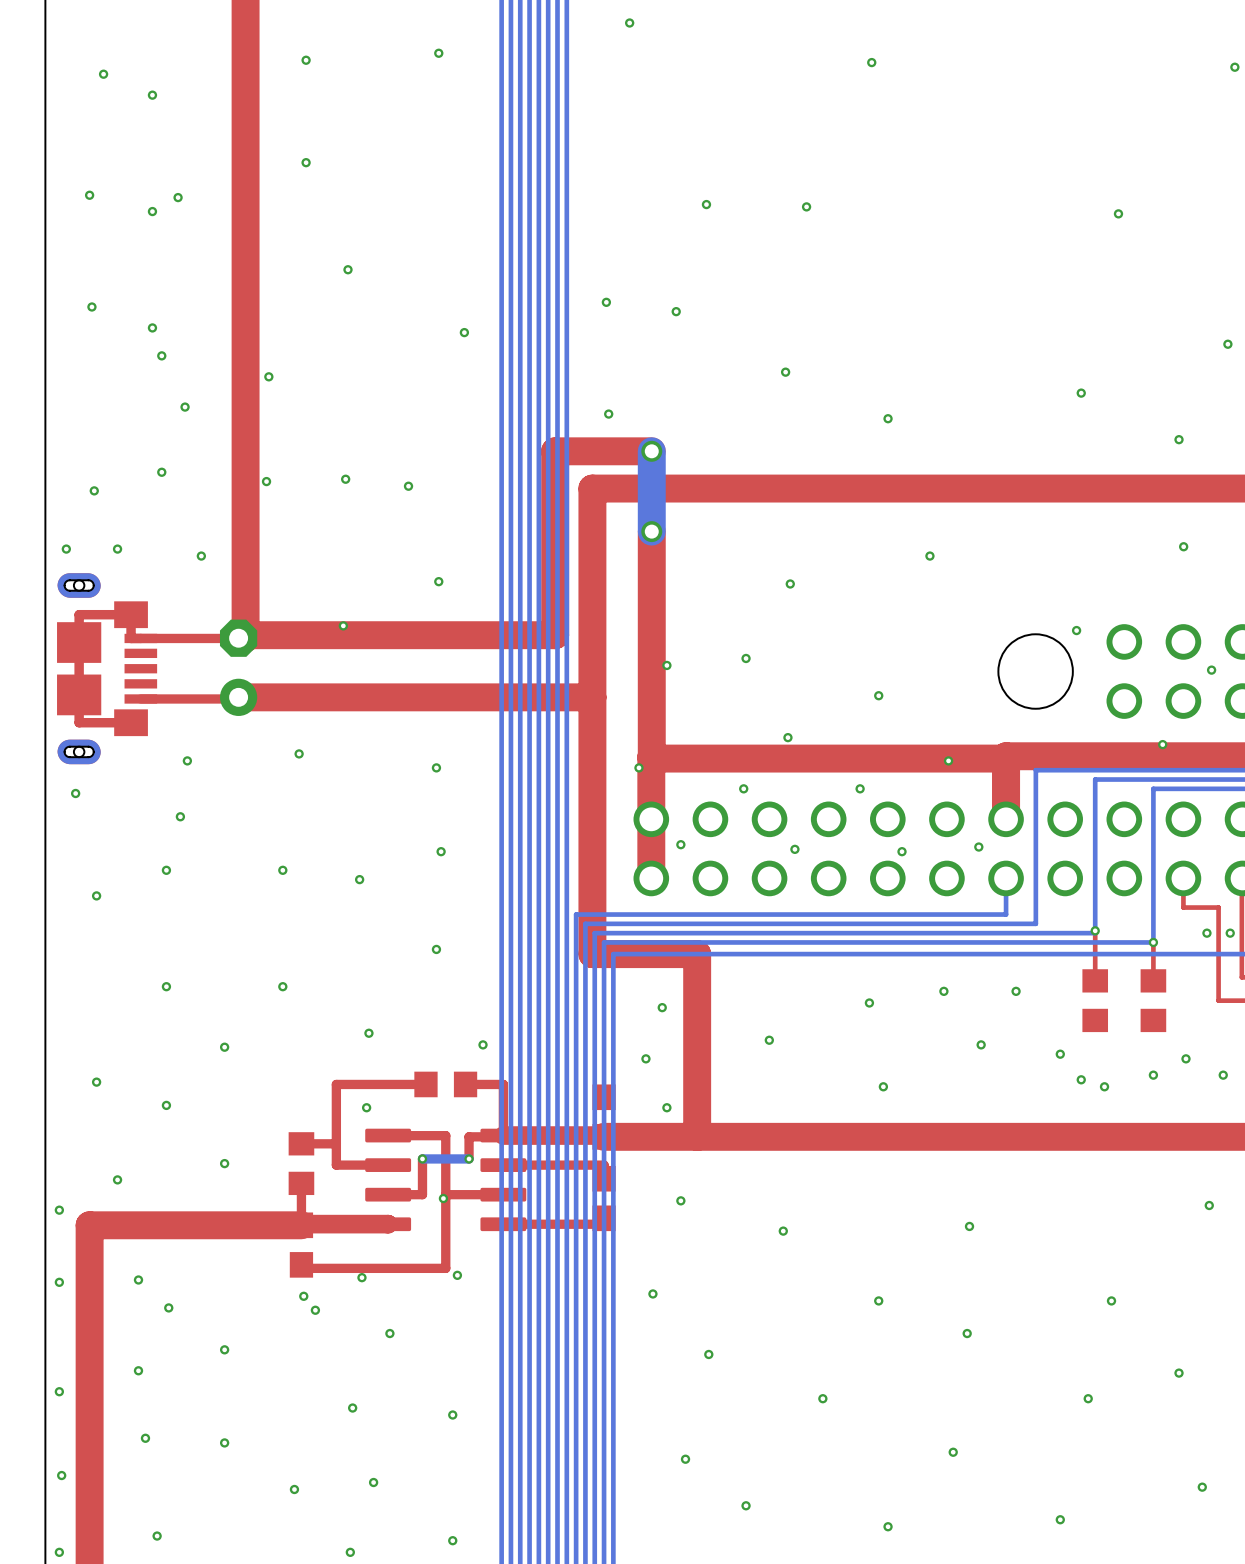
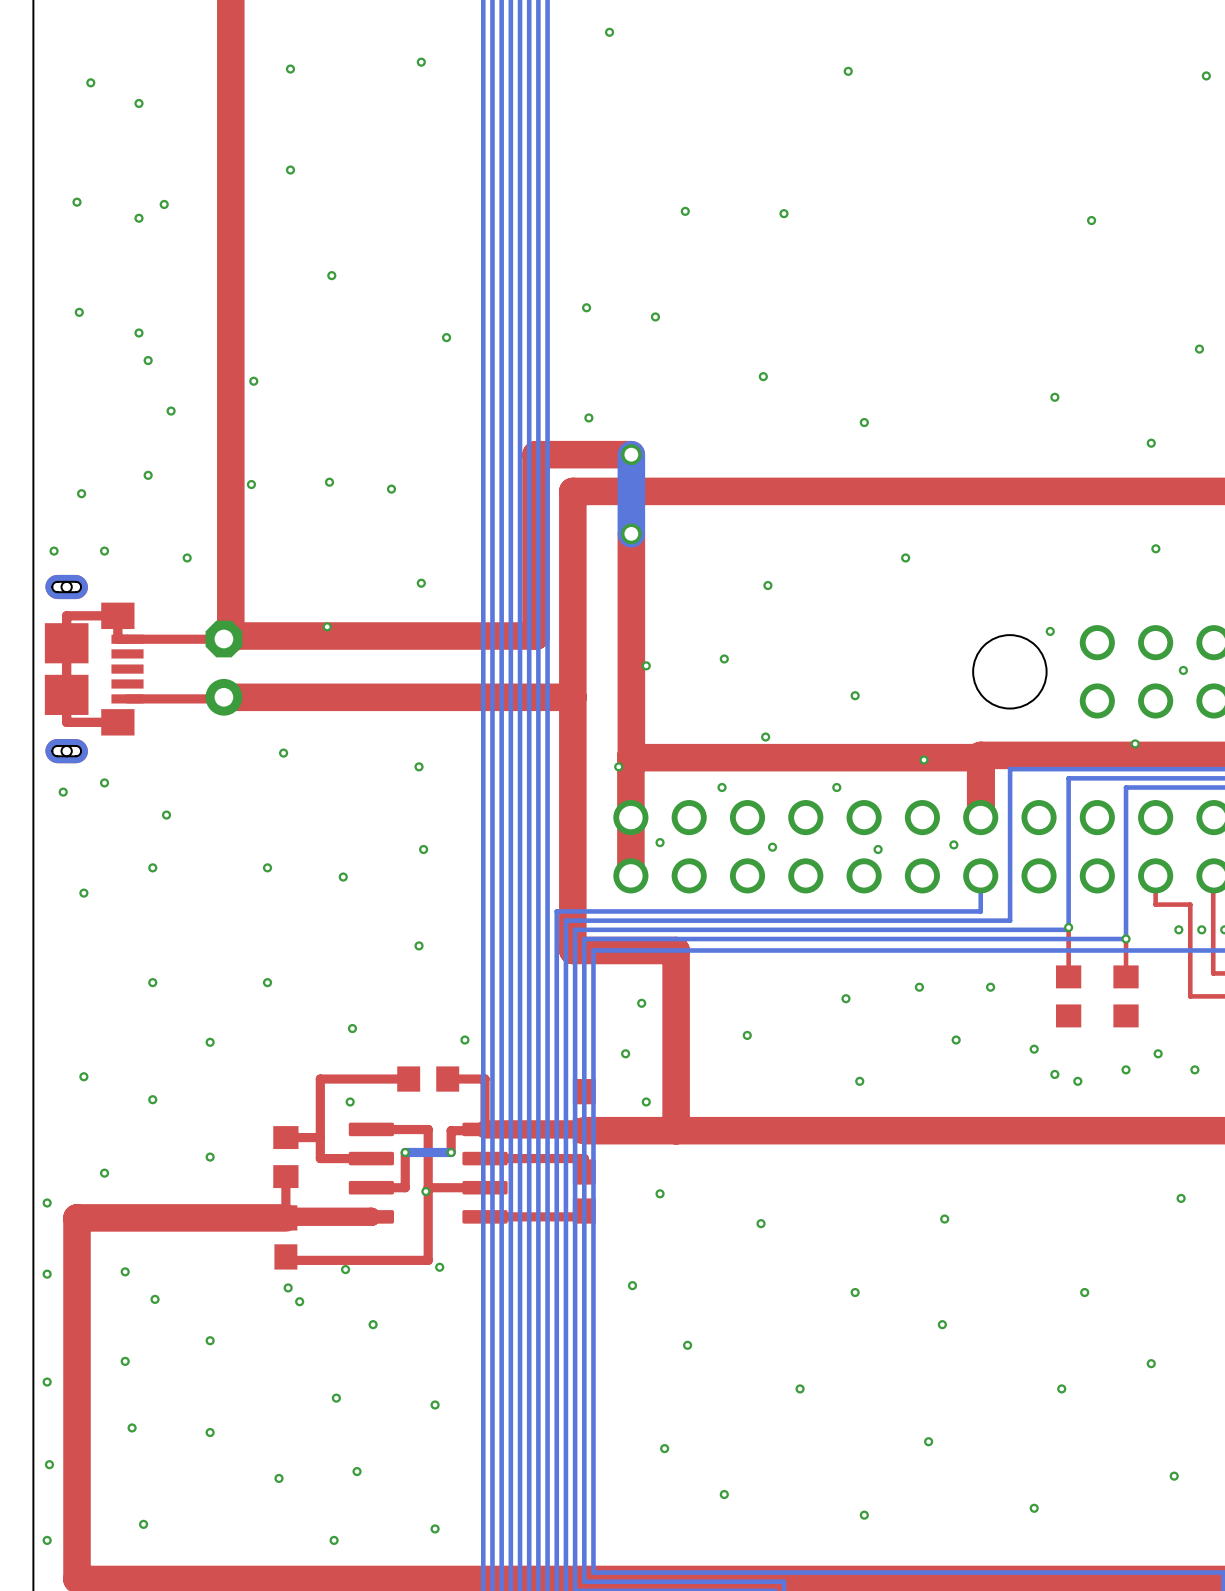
via position: (187, 760) -> (104, 782)

